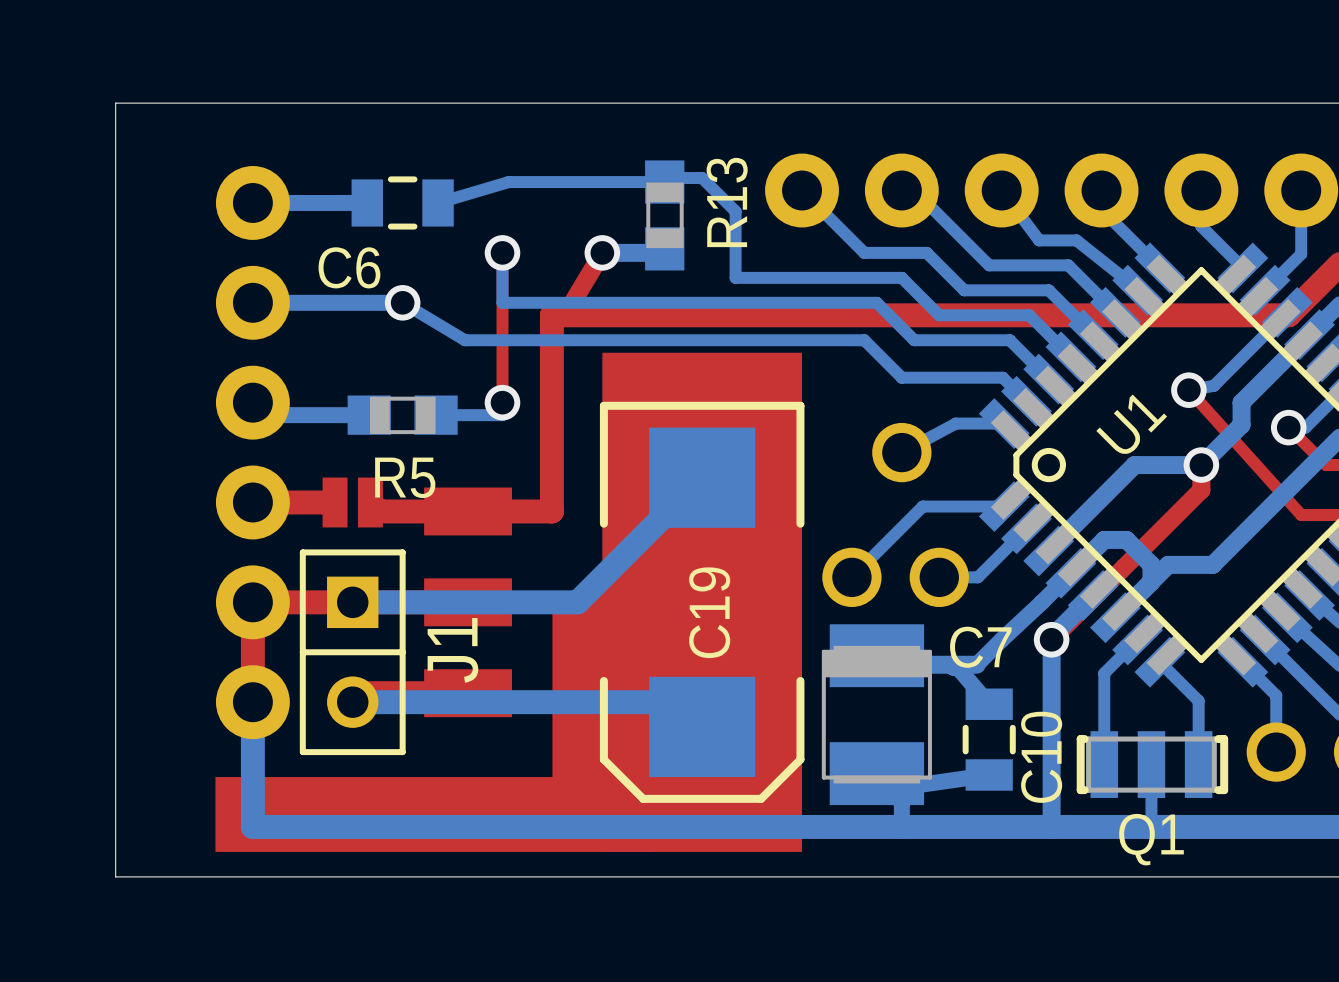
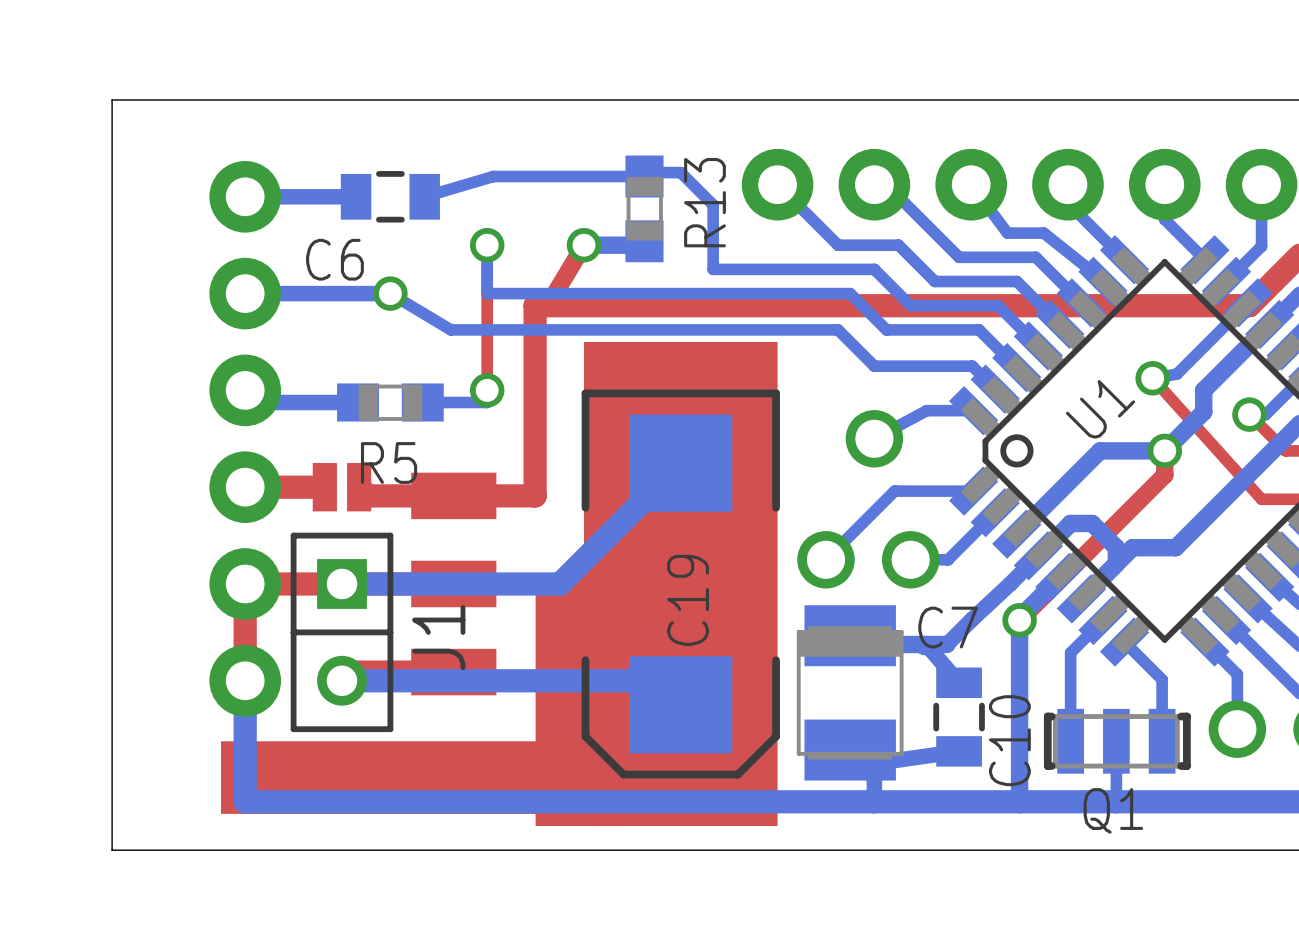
drawing position: (383, 814) -> (384, 777)

